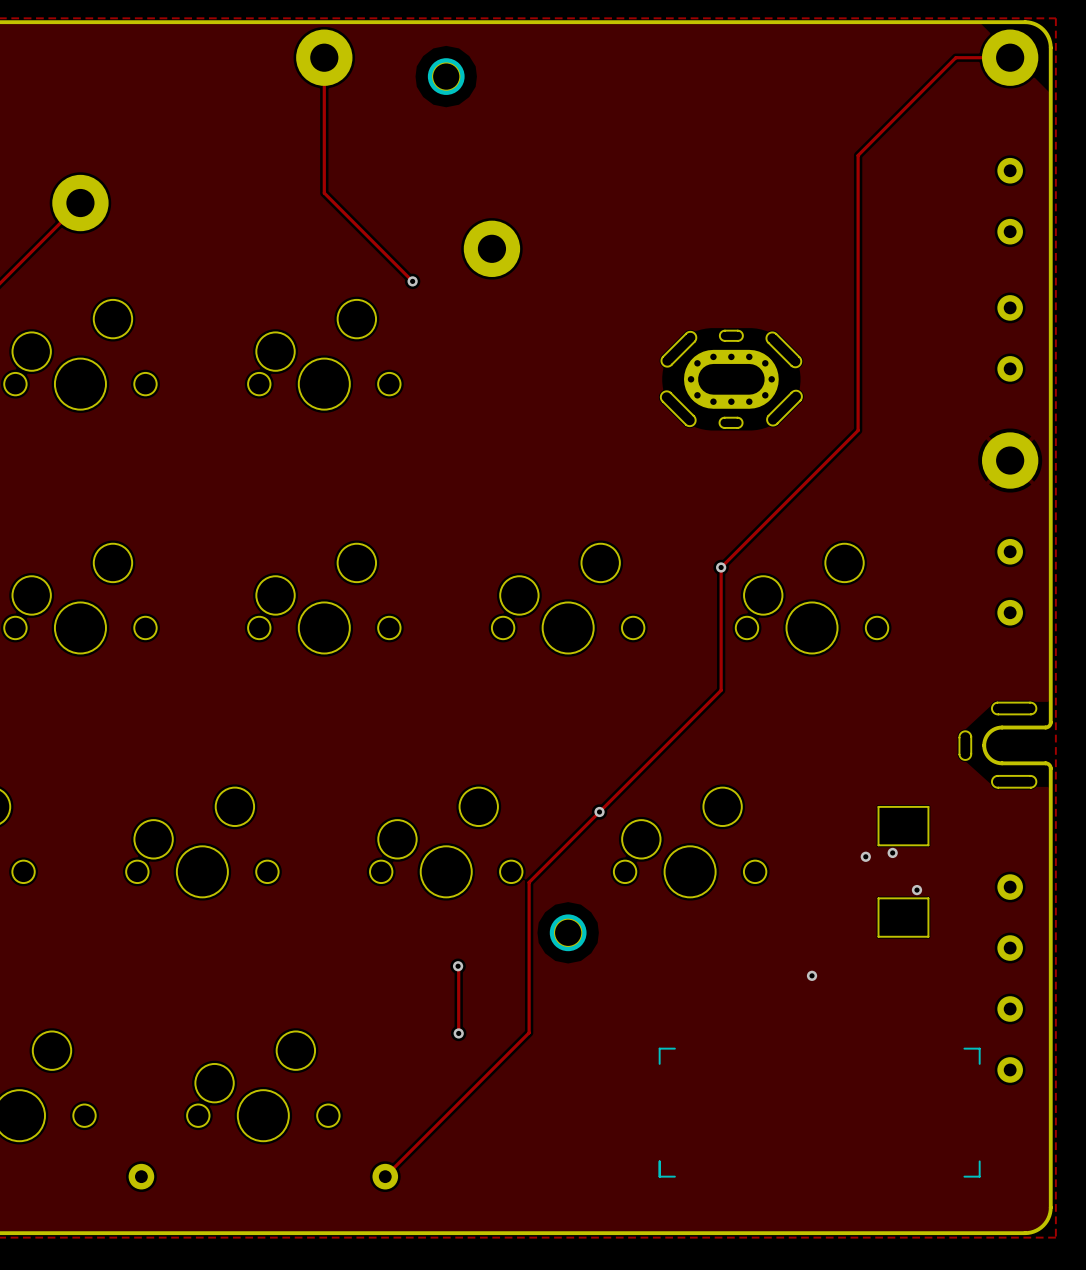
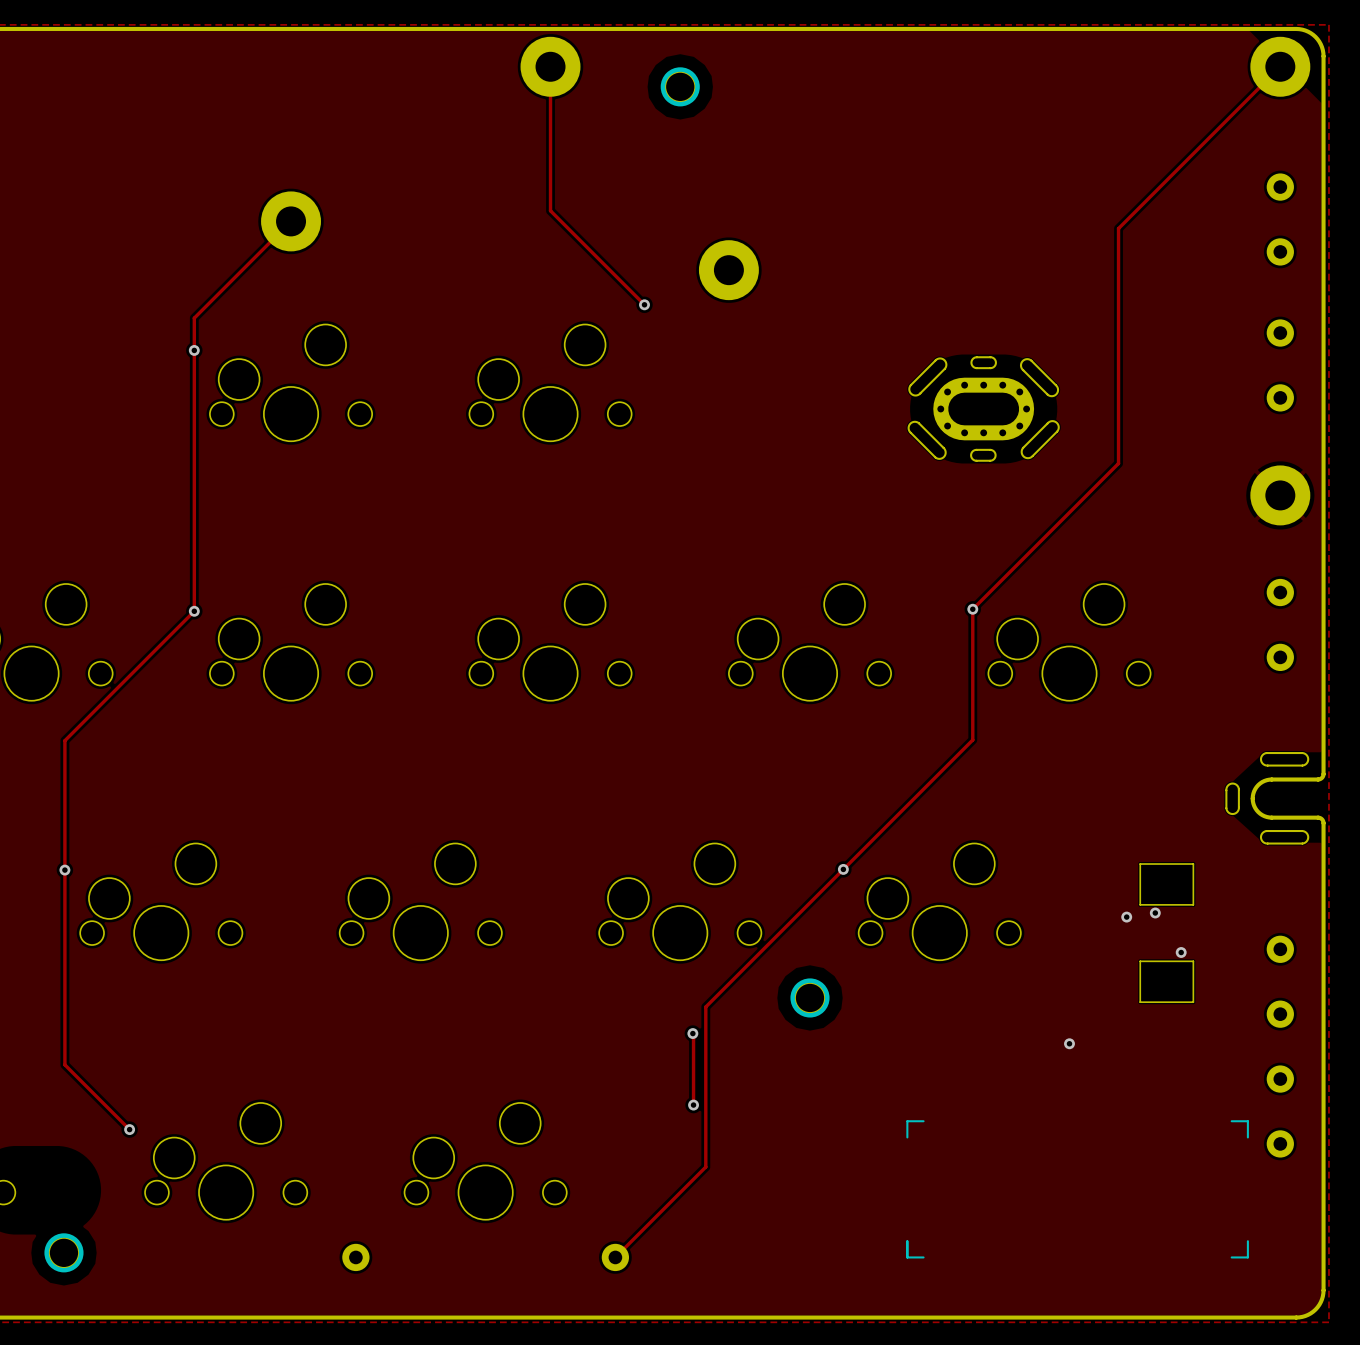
track: (1010, 57) (955, 57) (858, 155) (858, 209) -> (1280, 66) (1118, 228)
track: (529, 882) (529, 1032) (470, 1091) -> (768, 944) (705, 1006) (705, 1167)

